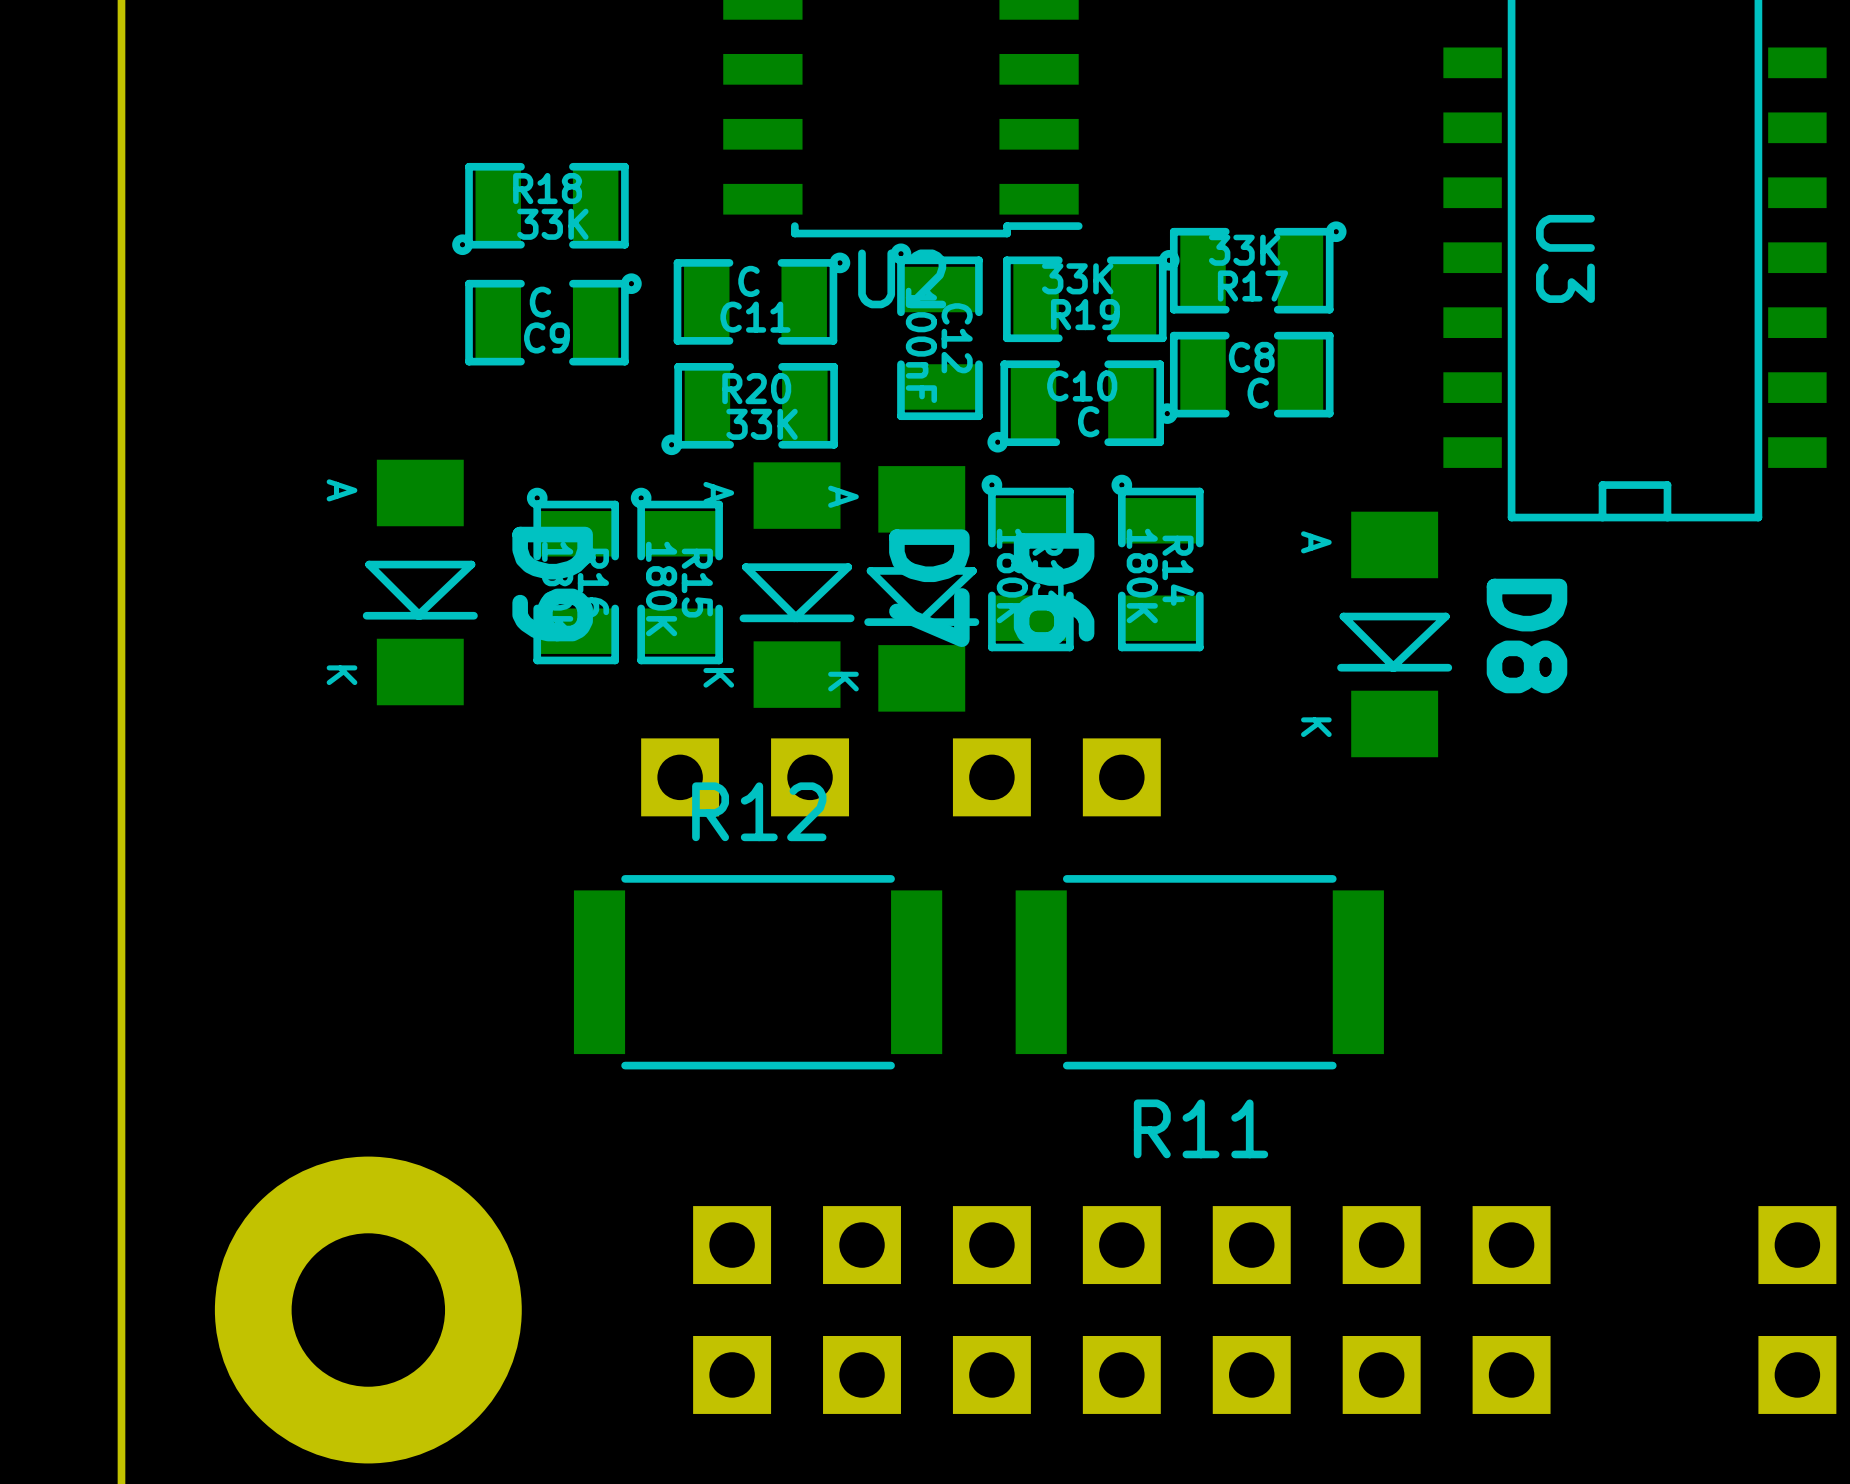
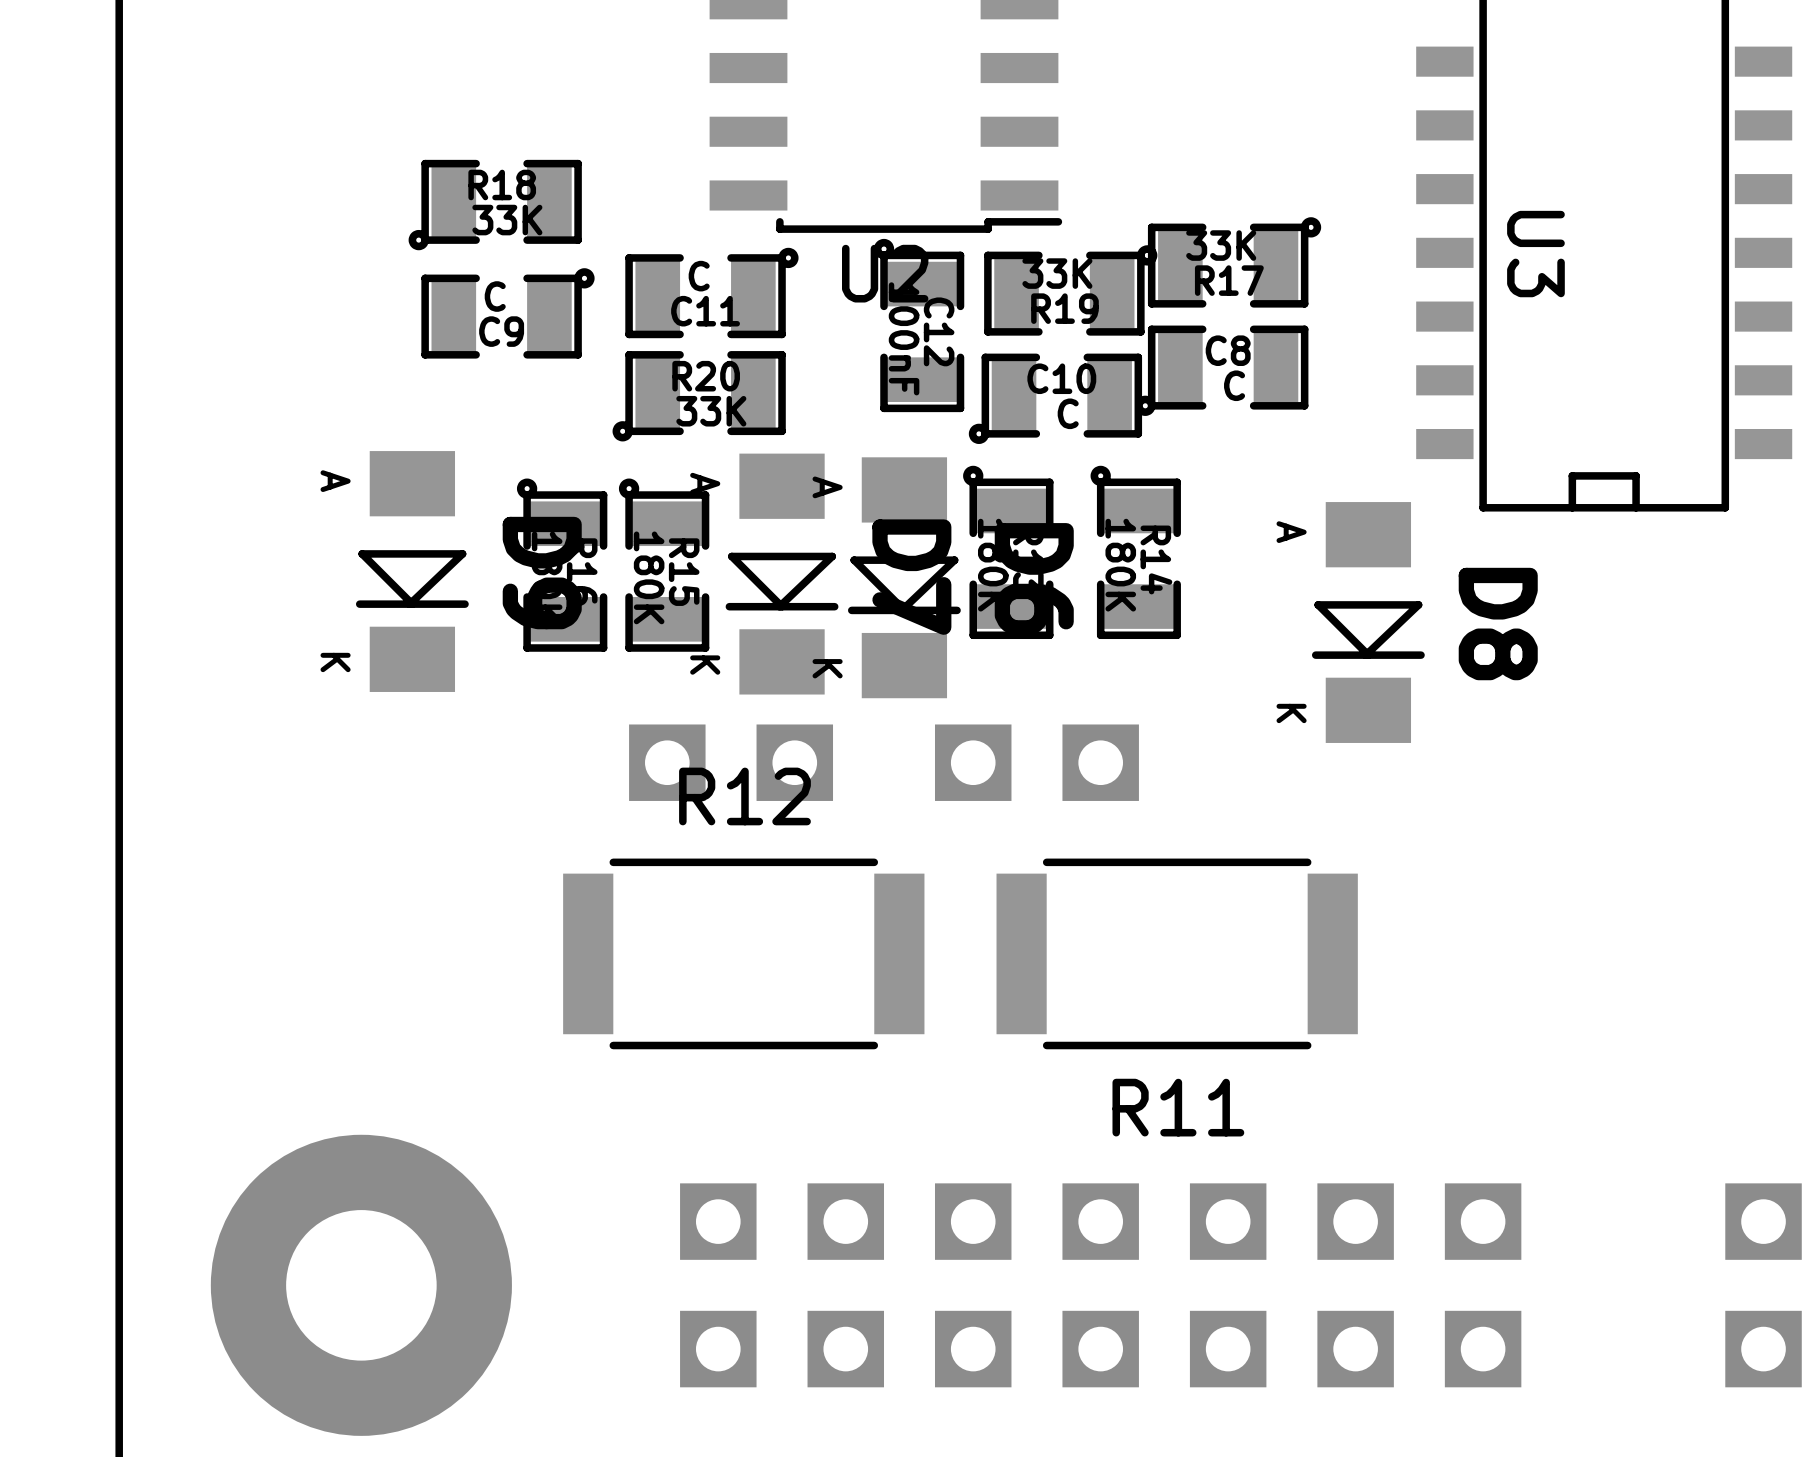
R18 position: (540, 208) -> (495, 205)
C11 position: (761, 298) -> (711, 293)
C9 position: (553, 319) -> (507, 313)
R20 position: (749, 409) -> (699, 396)

